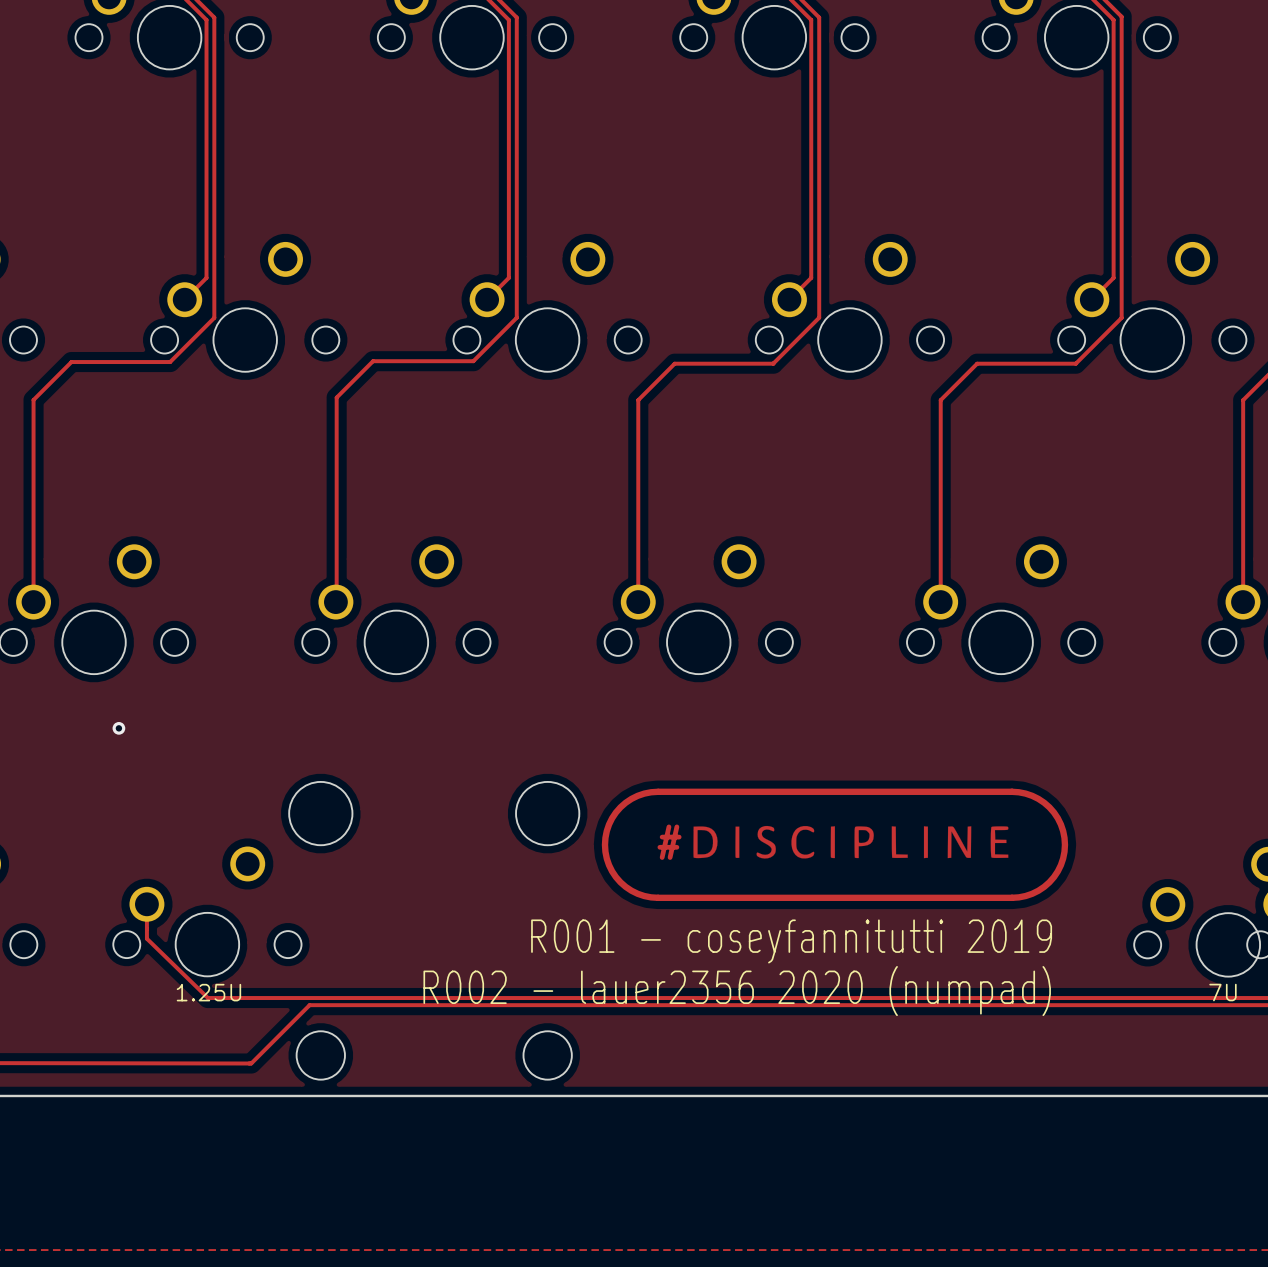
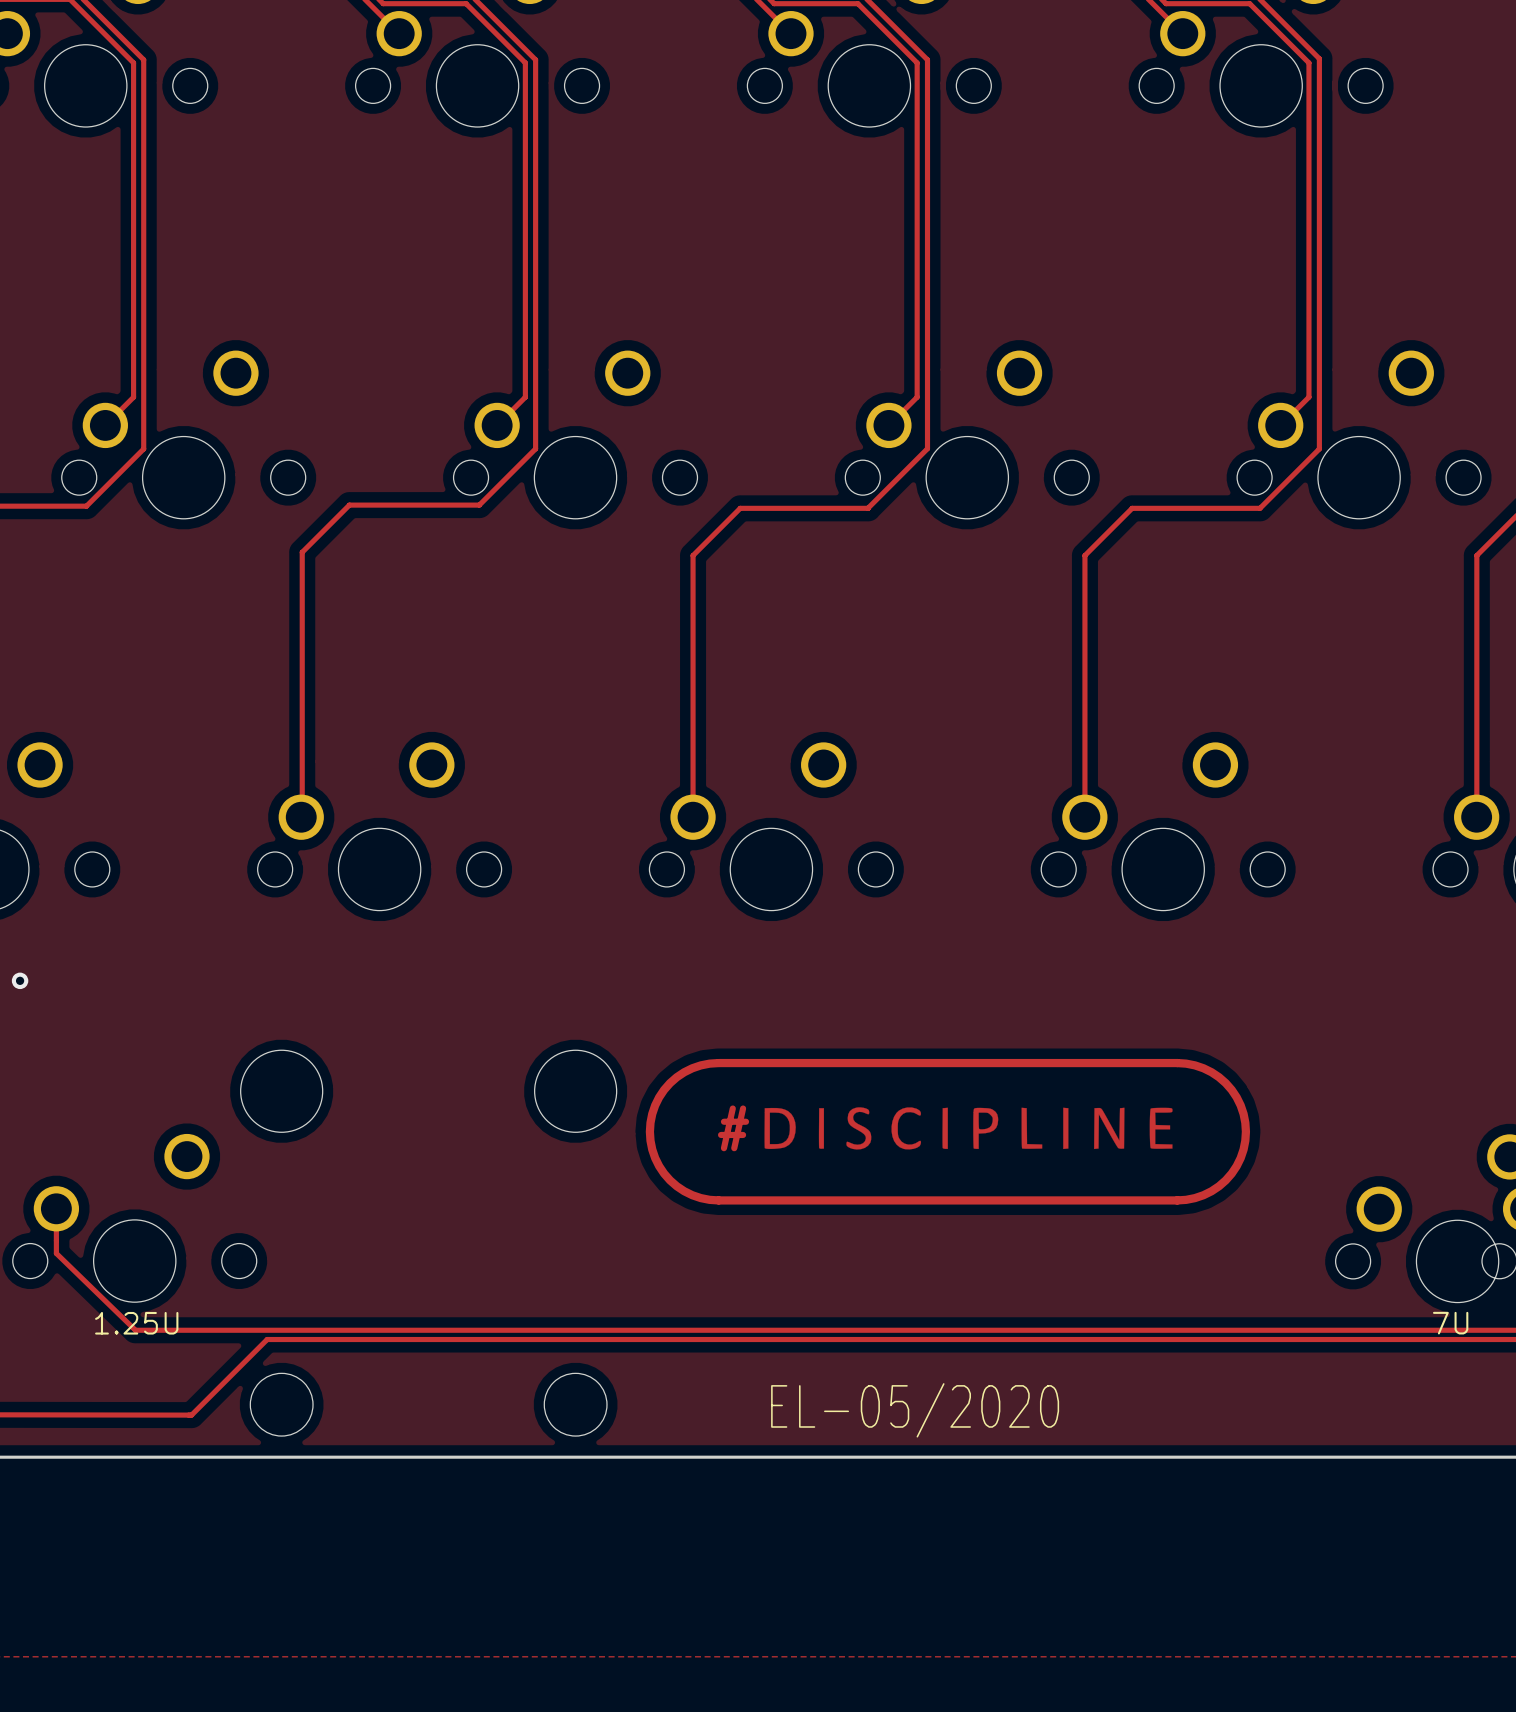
text: R001 - coseyfannitutti 2019 (791, 941) -> none
text: R002 - lauer2356 2020 (numpad) (737, 991) -> none
text: none -> EL-05/2020 (915, 1410)

